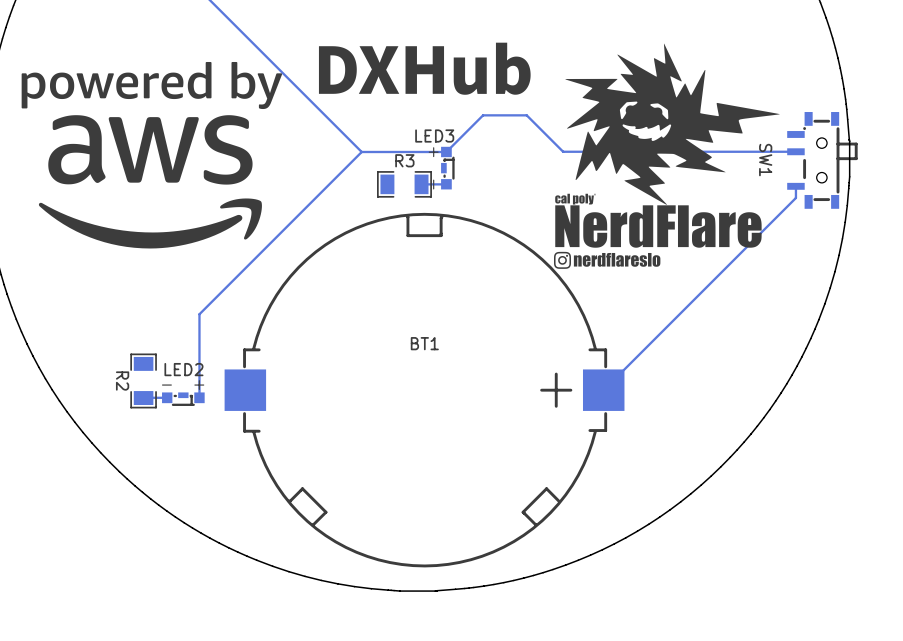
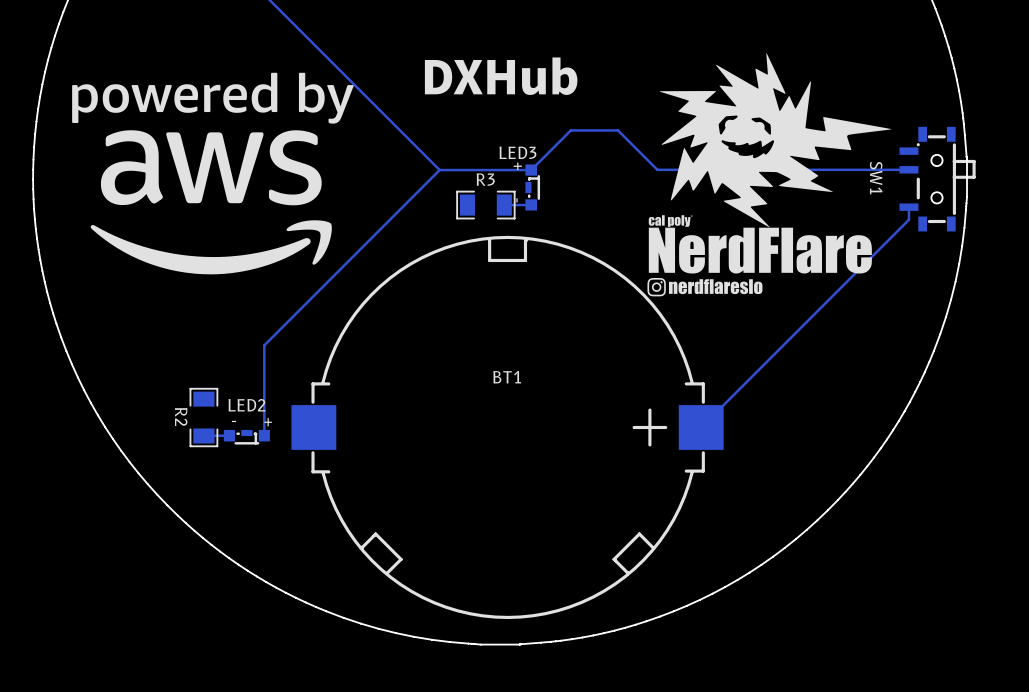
drawing: [453, 42, 531, 95] -> none
drawing: [318, 46, 400, 94] -> none
drawing shape: [405, 46, 445, 94] -> [487, 59, 516, 95]
drawing: none -> [522, 57, 578, 95]
drawing: none -> [424, 59, 483, 95]

